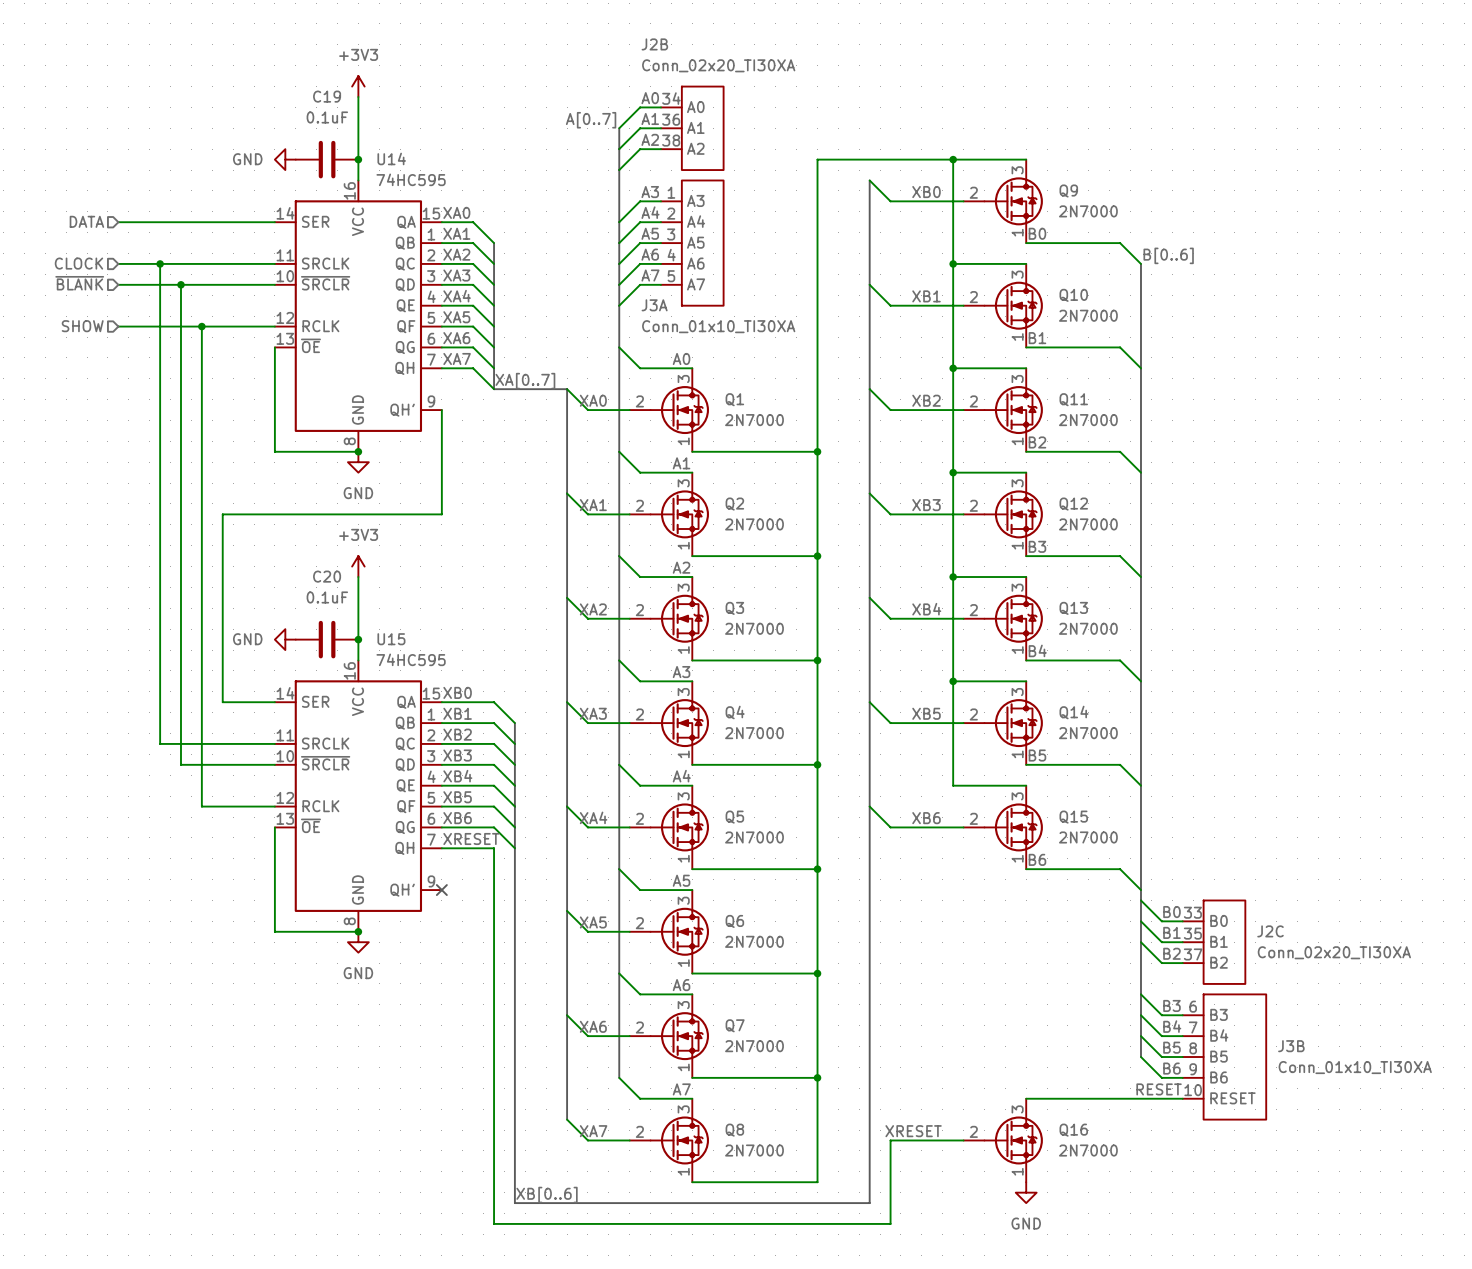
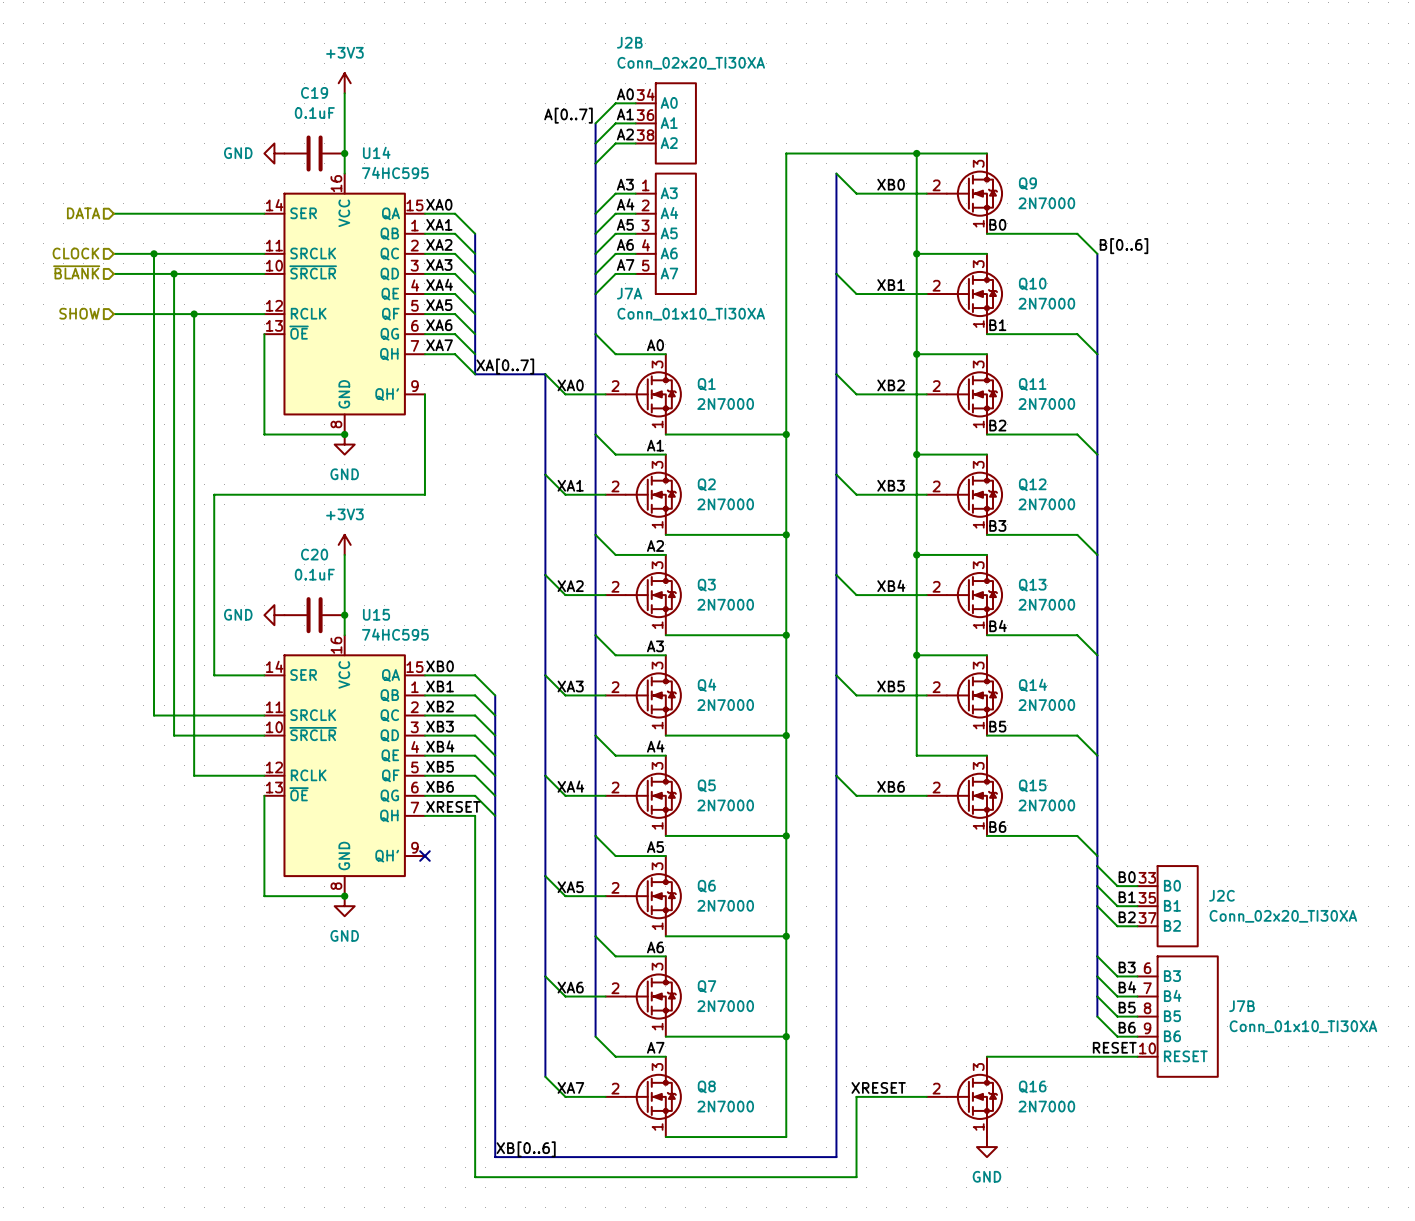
J3A name: J3A (654, 305) -> J7A (629, 293)
J3B name: J3B (1291, 1046) -> J7B (1242, 1006)

